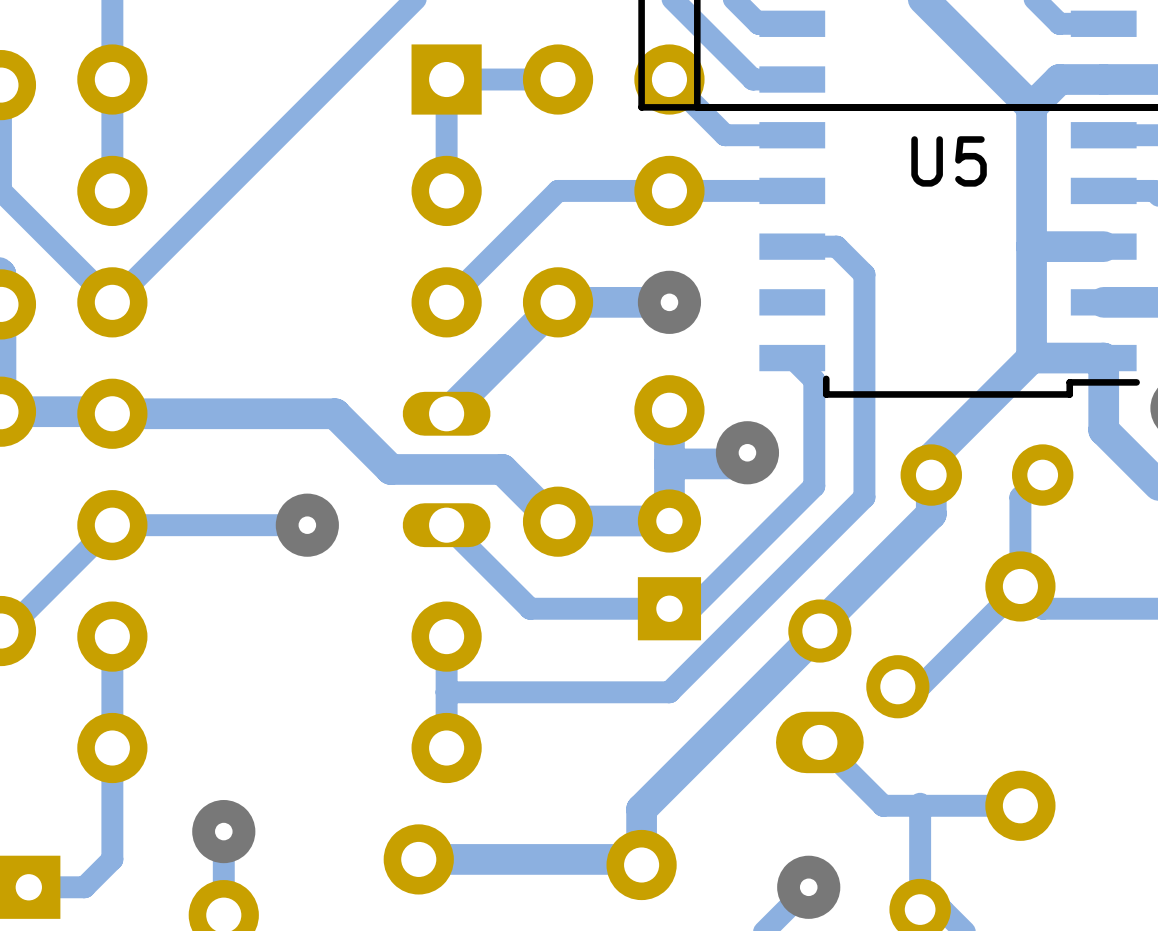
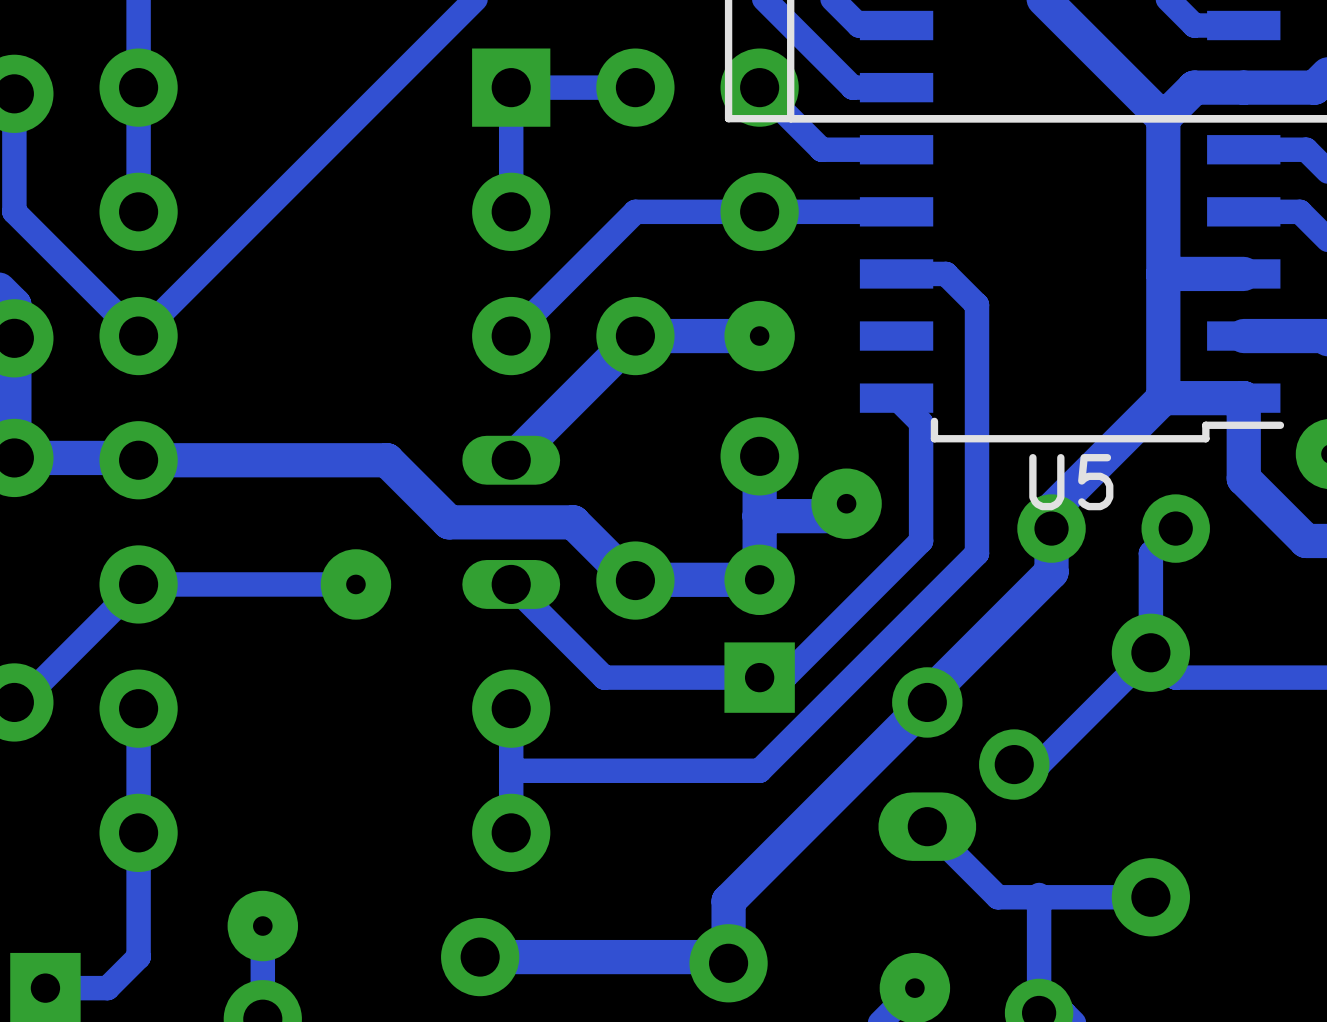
U5 name position: U5 (949, 161) -> U5 (1071, 482)

